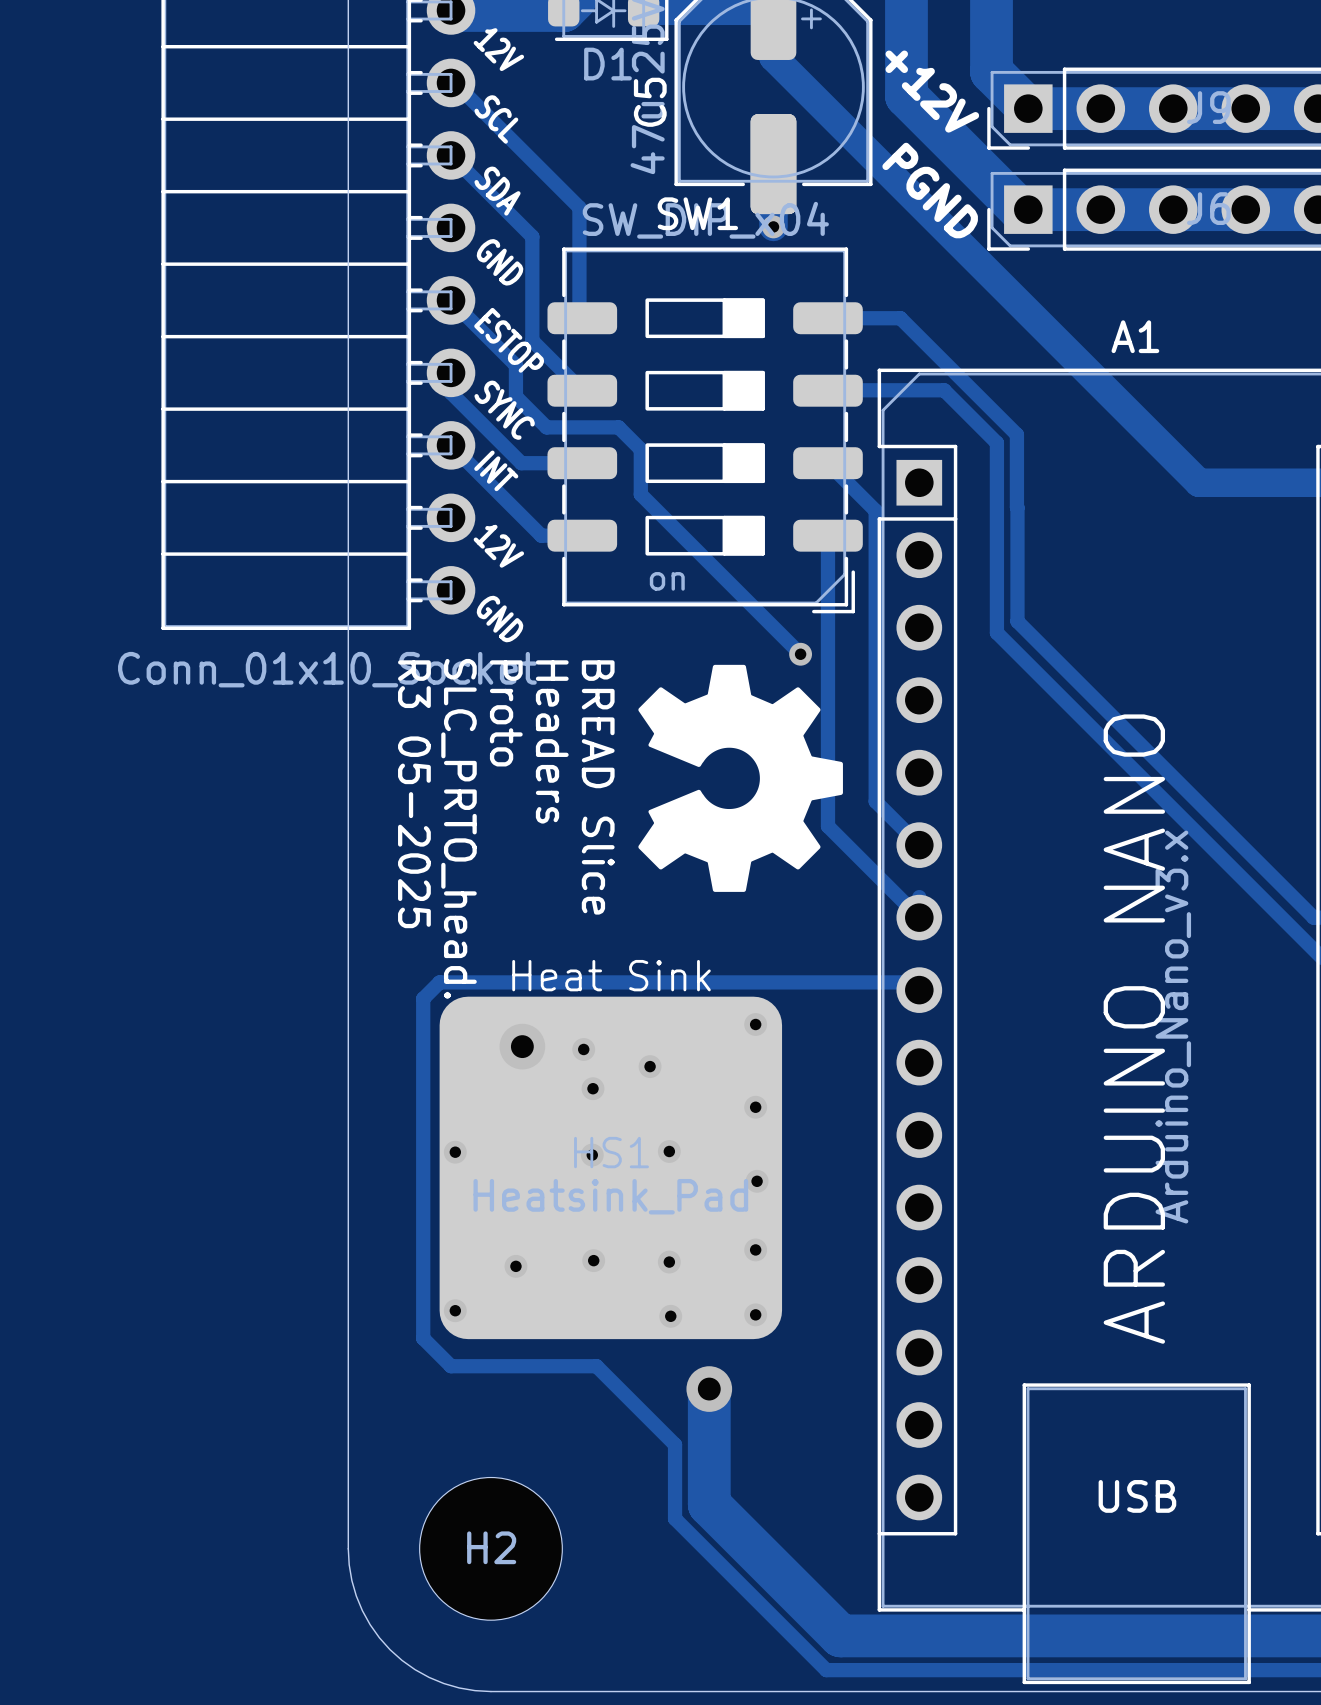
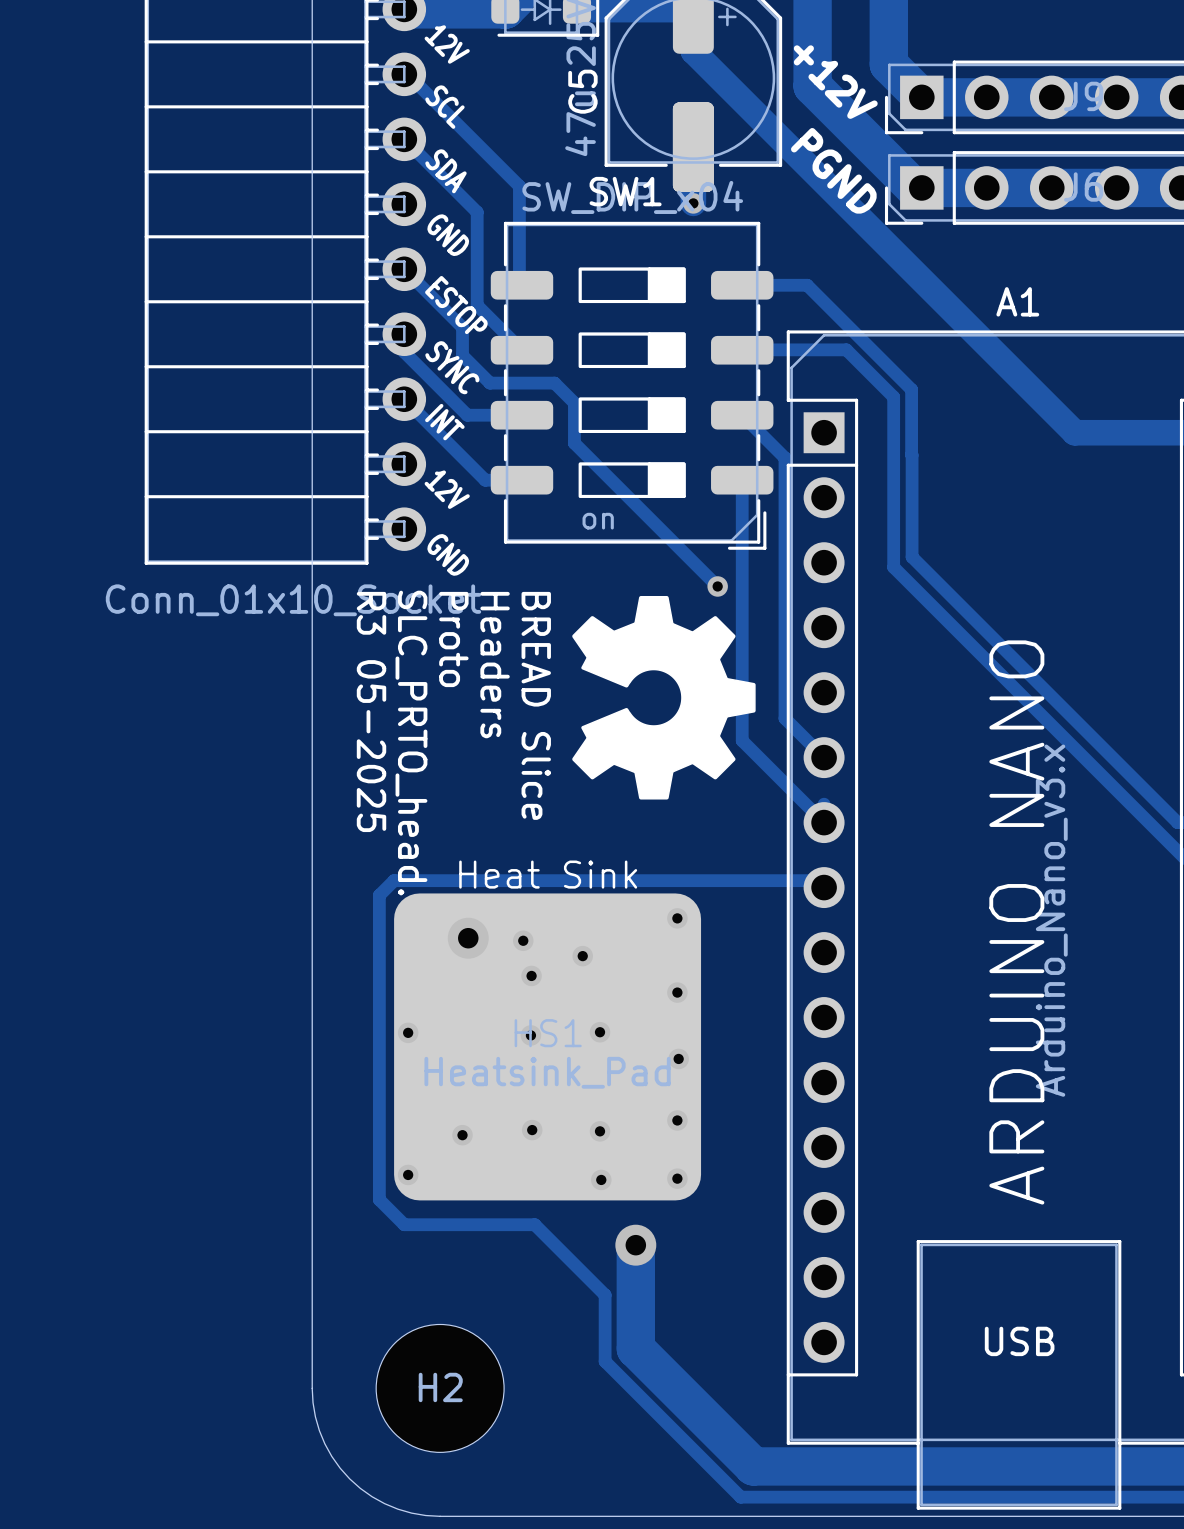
D1 name: D1 (608, 64) -> none

